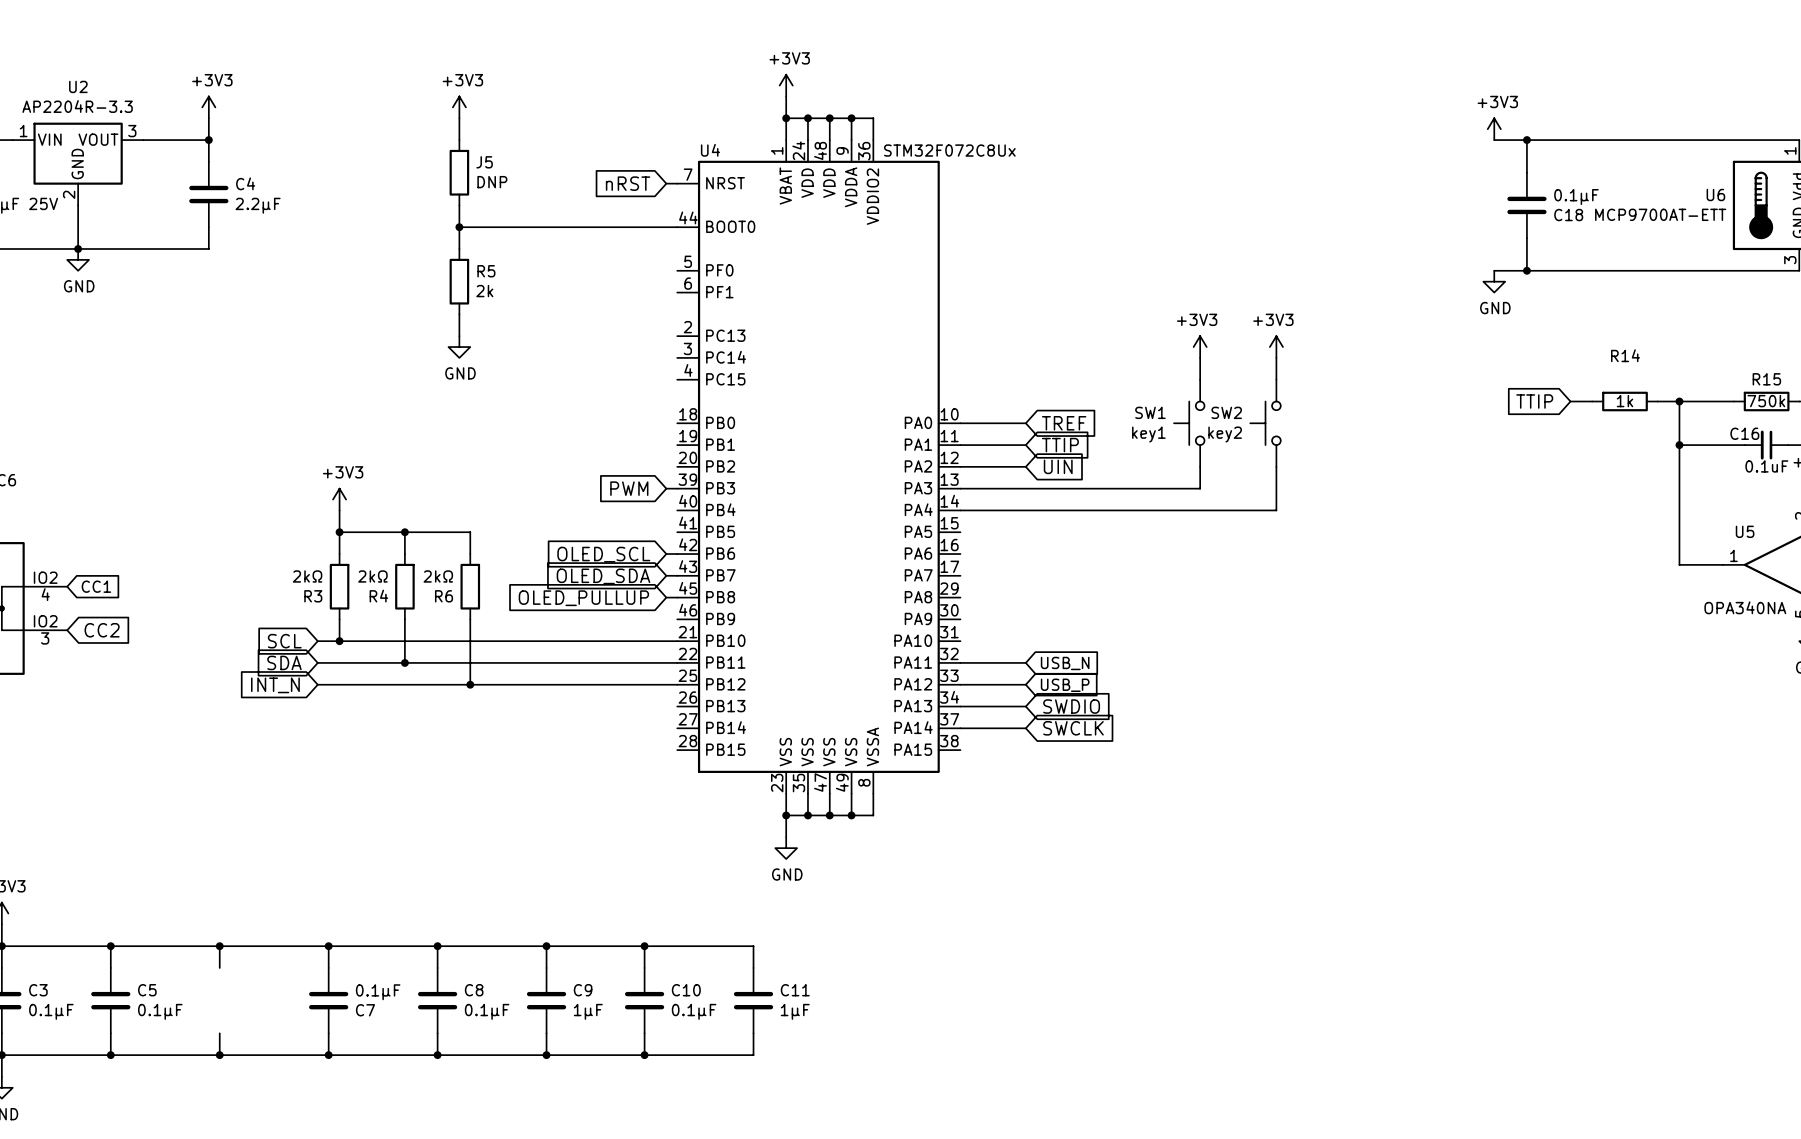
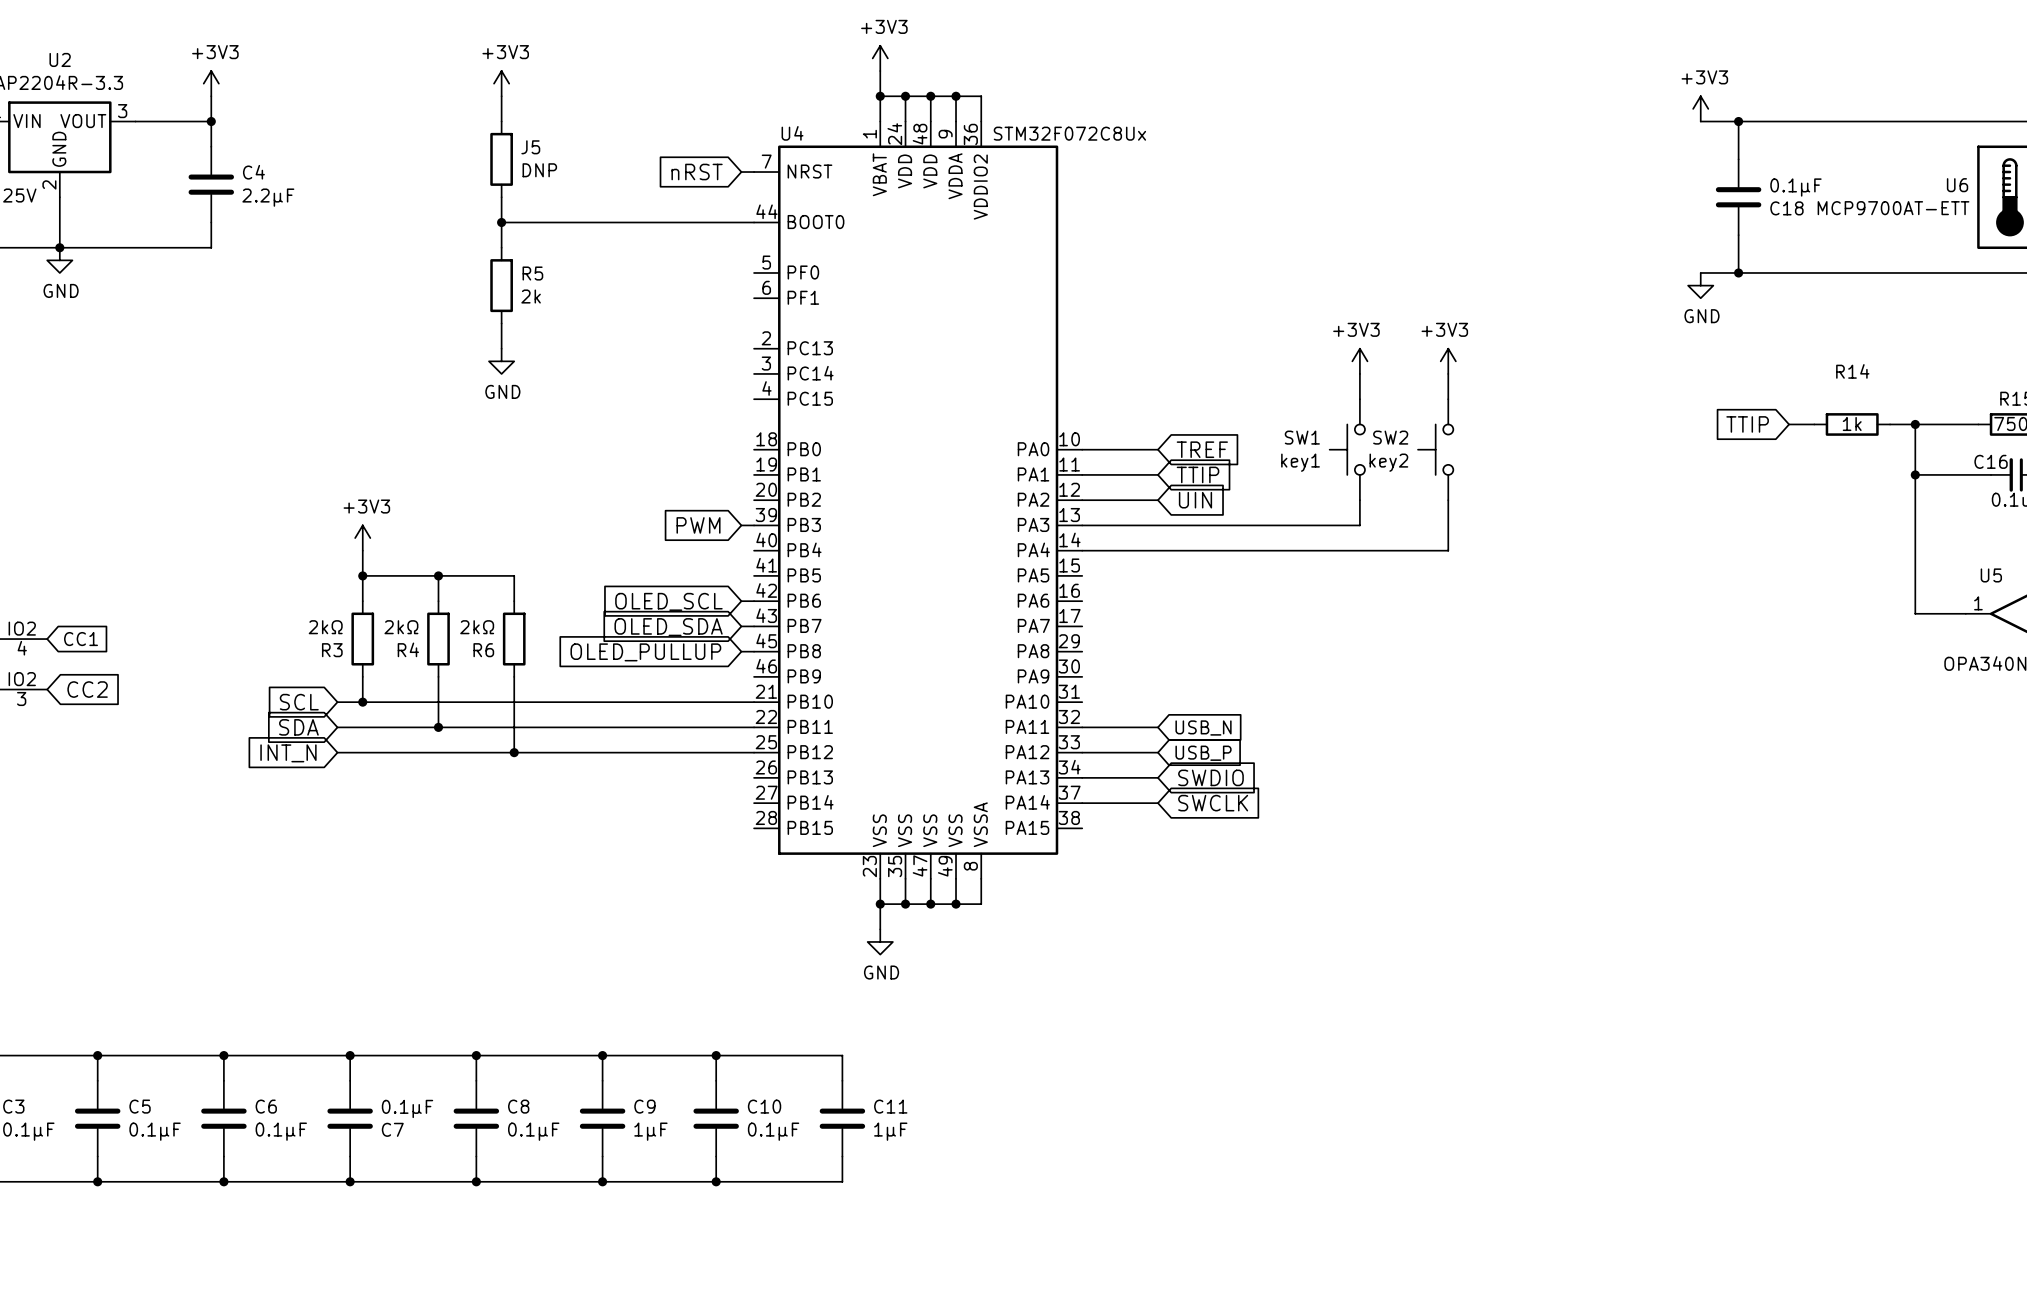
C6: none -> 0.1μF (223, 1118)

